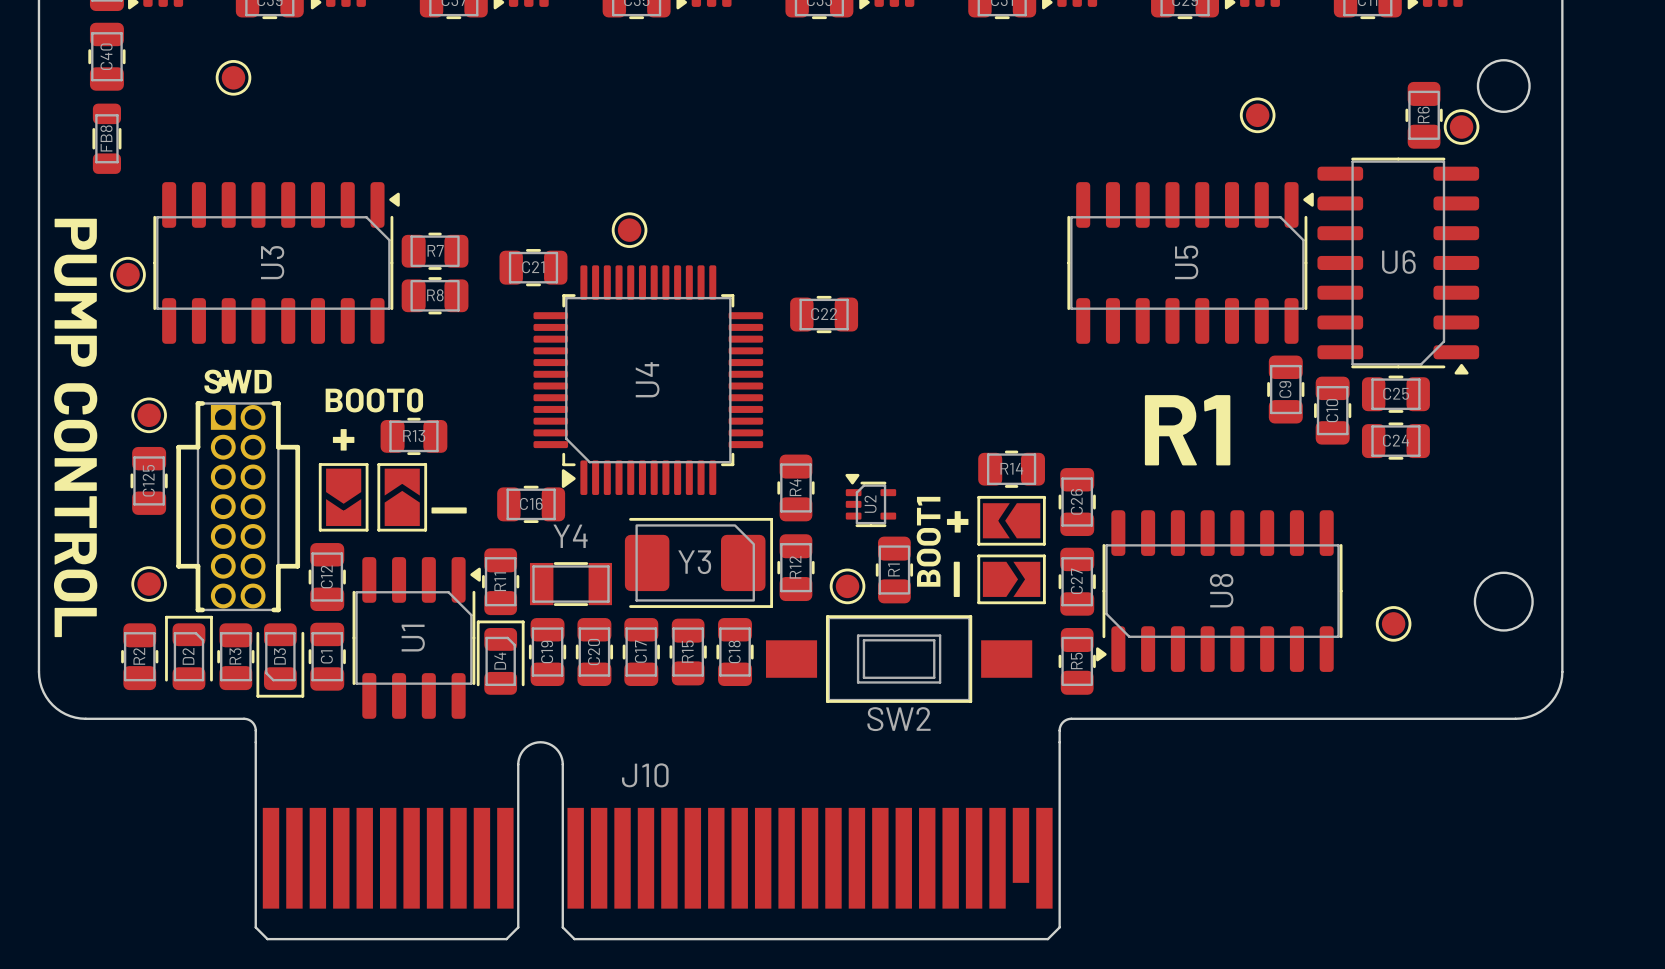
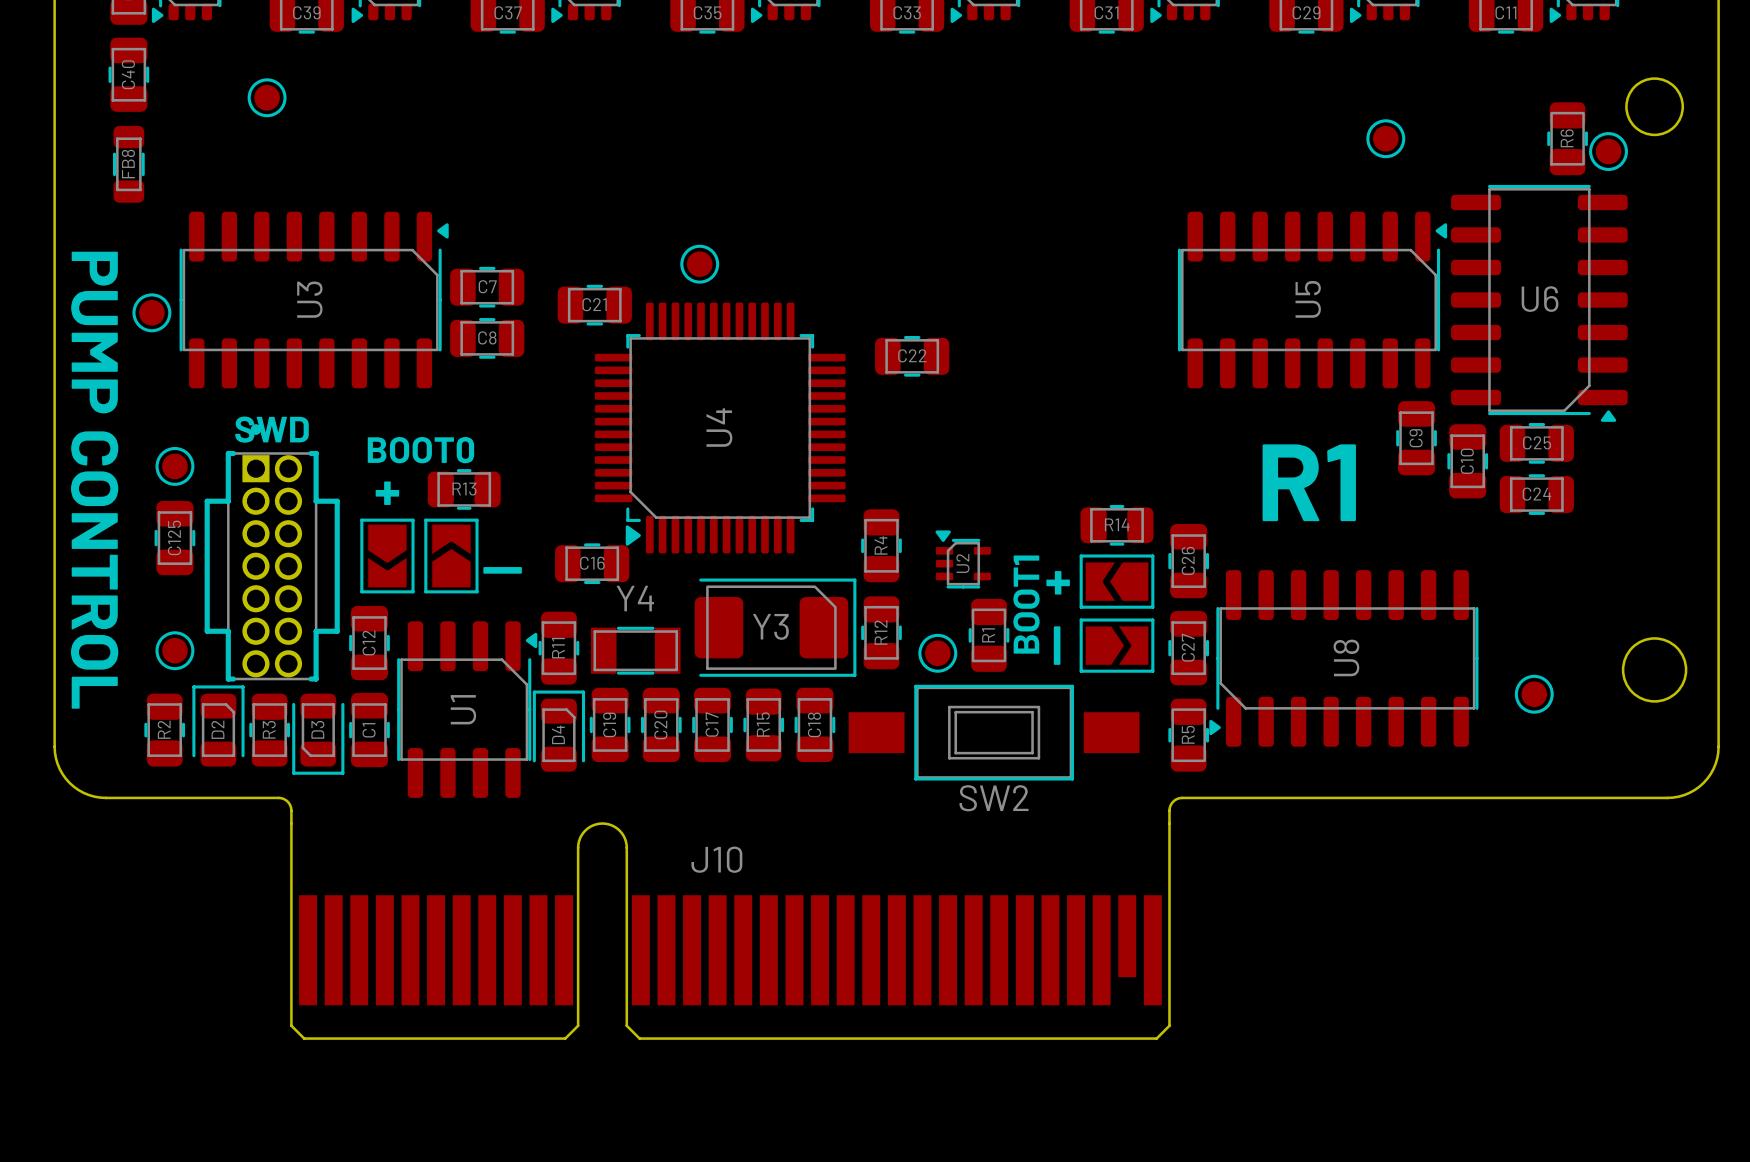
R7: (435, 251) -> none
C7: none -> (487, 287)
R8: (435, 295) -> none
C8: none -> (487, 338)

